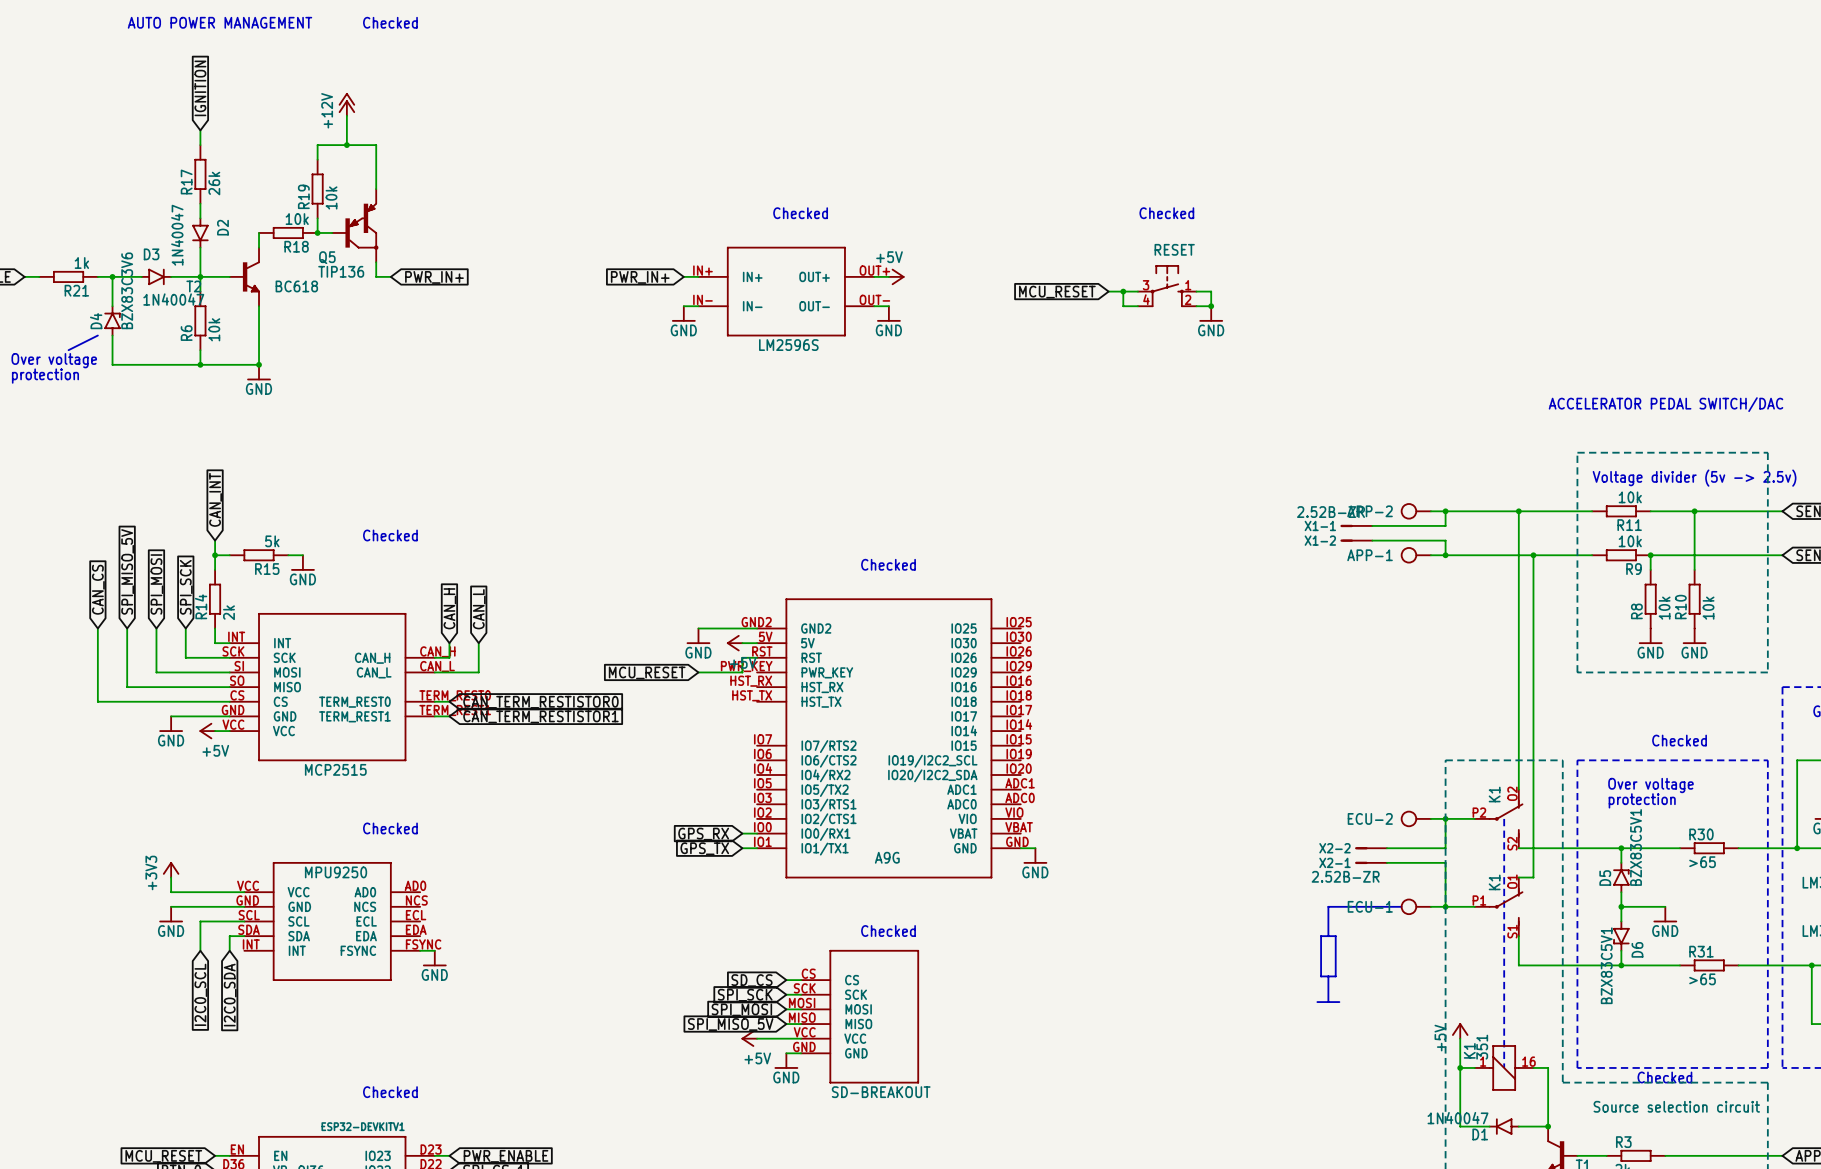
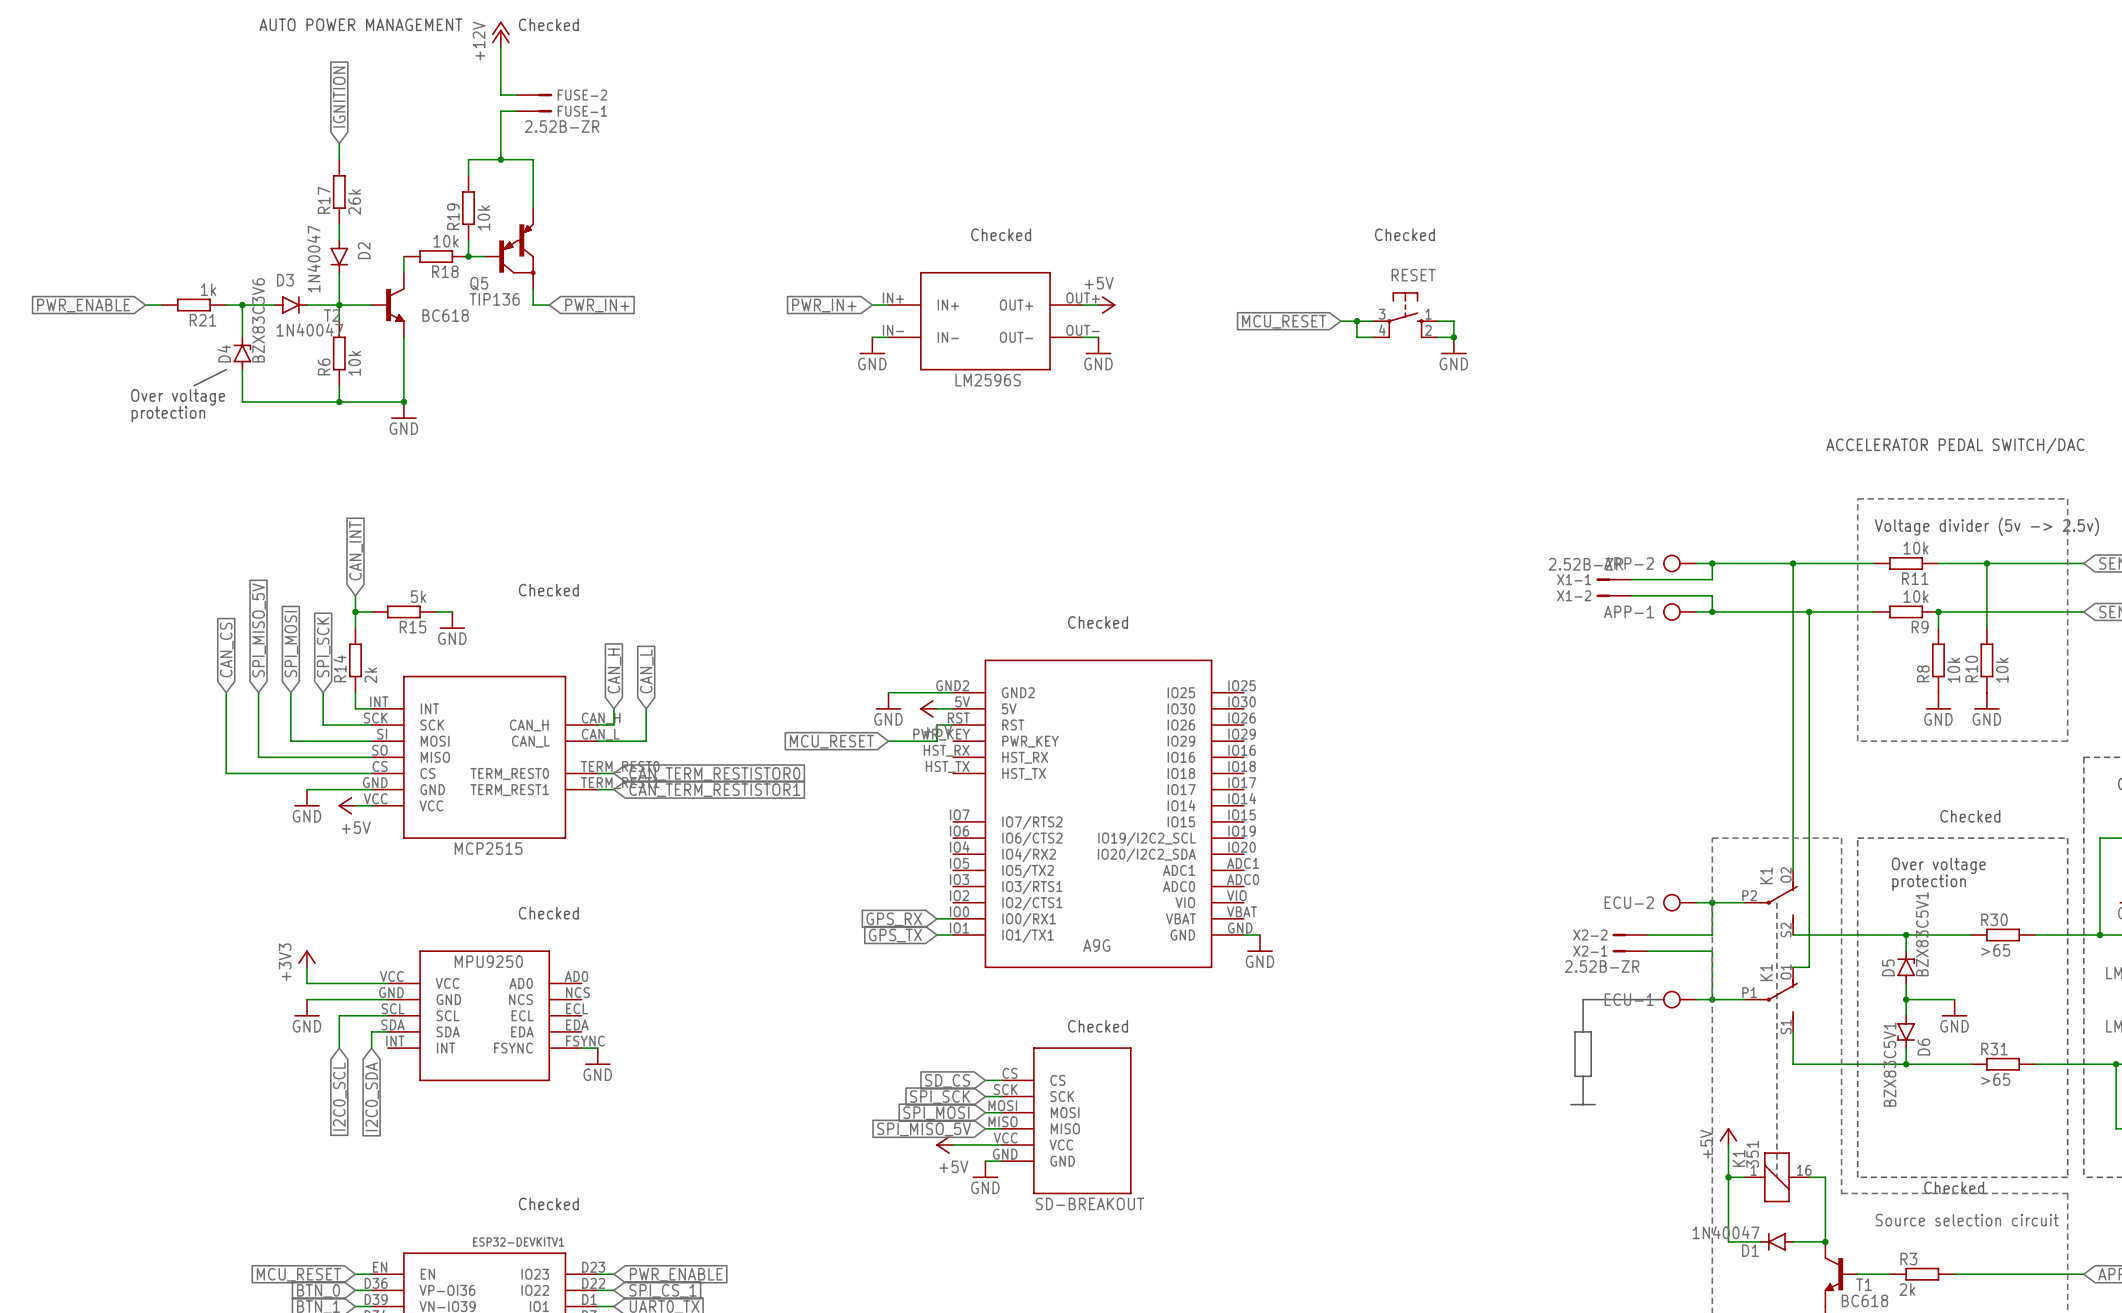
wire: none -> (500, 46) (500, 95) (516, 95)
FUSE-2: none -> (534, 95)
FUSE-1: none -> 2.52B-ZR (534, 111)
power symbol position: +12V (346, 104) -> +12V (500, 34)

